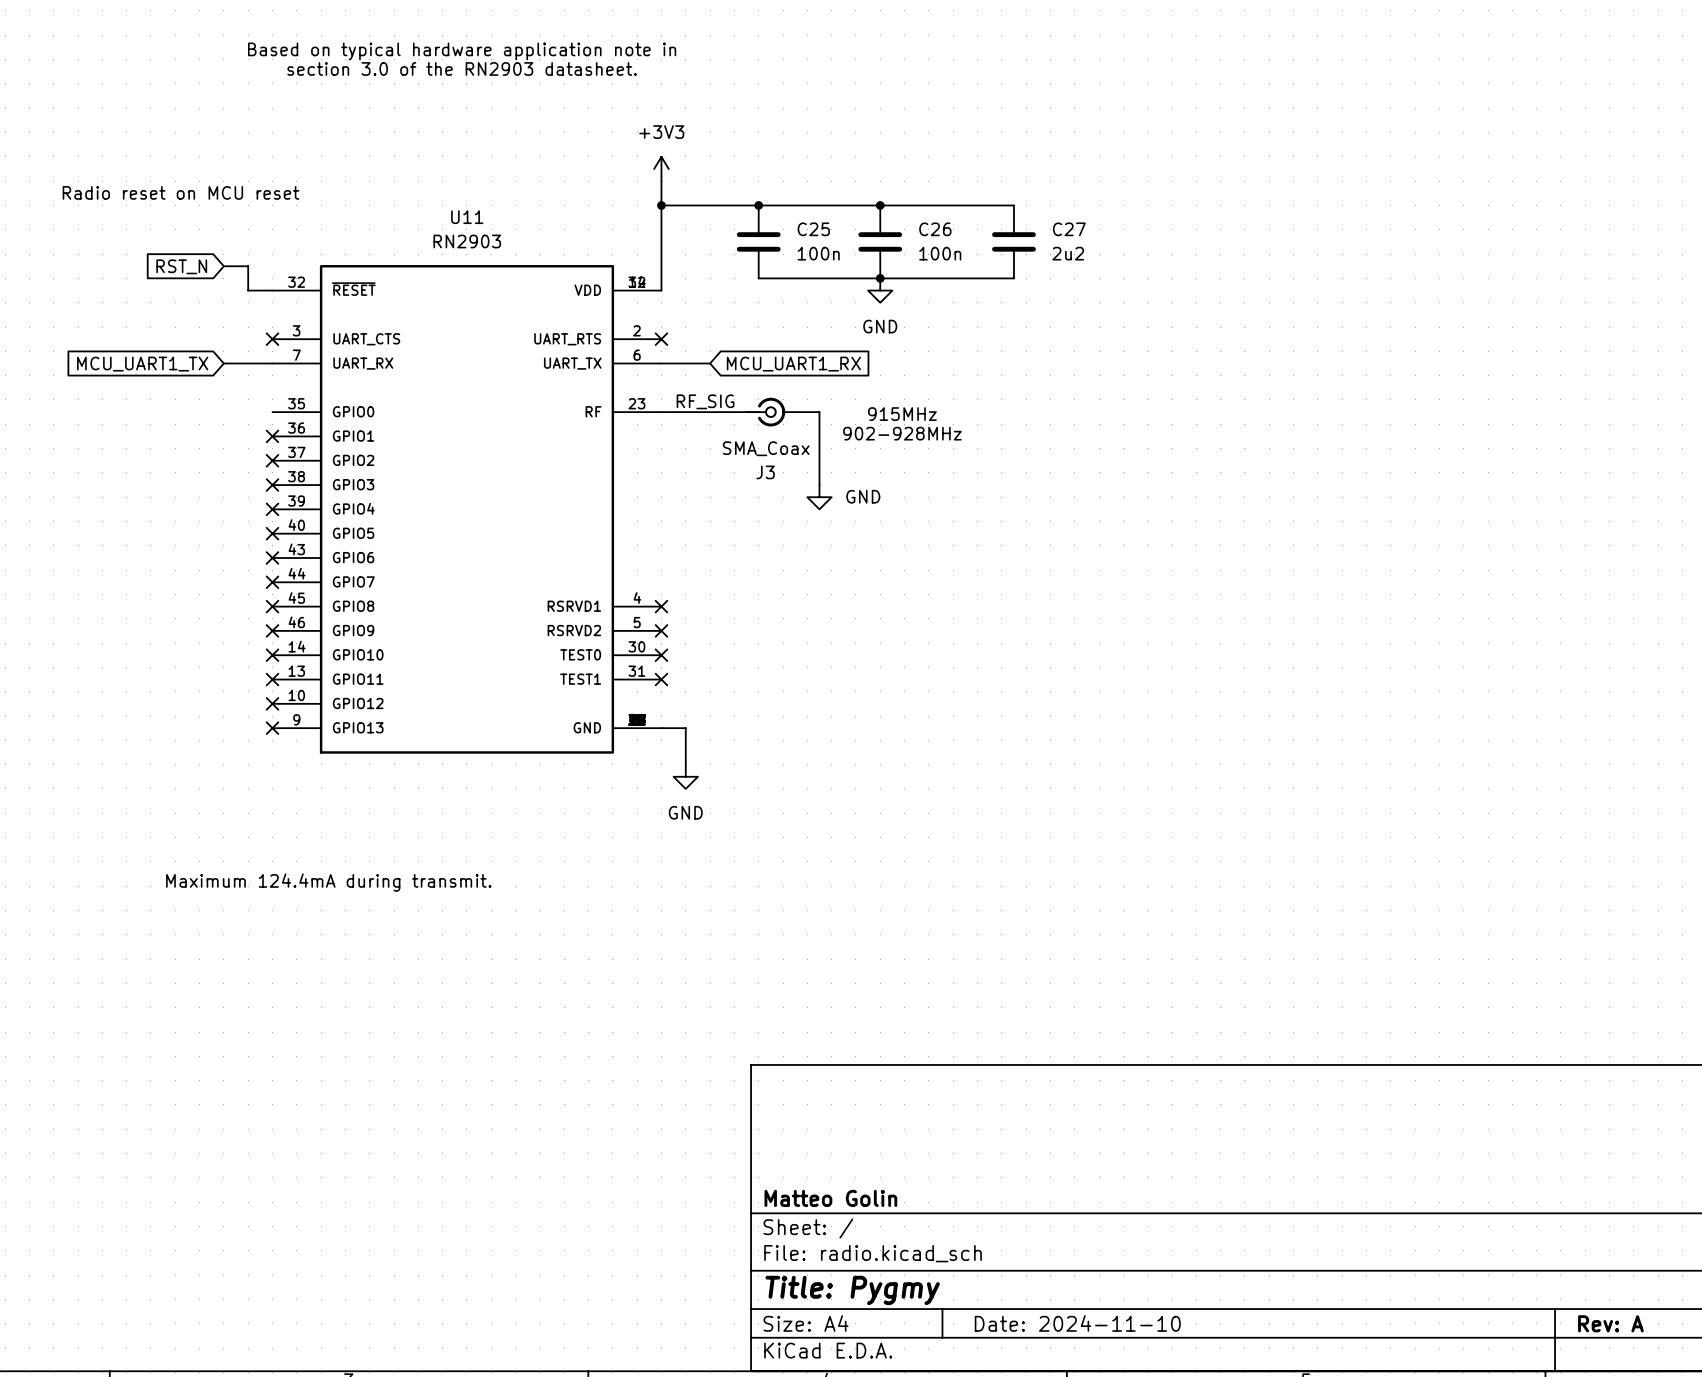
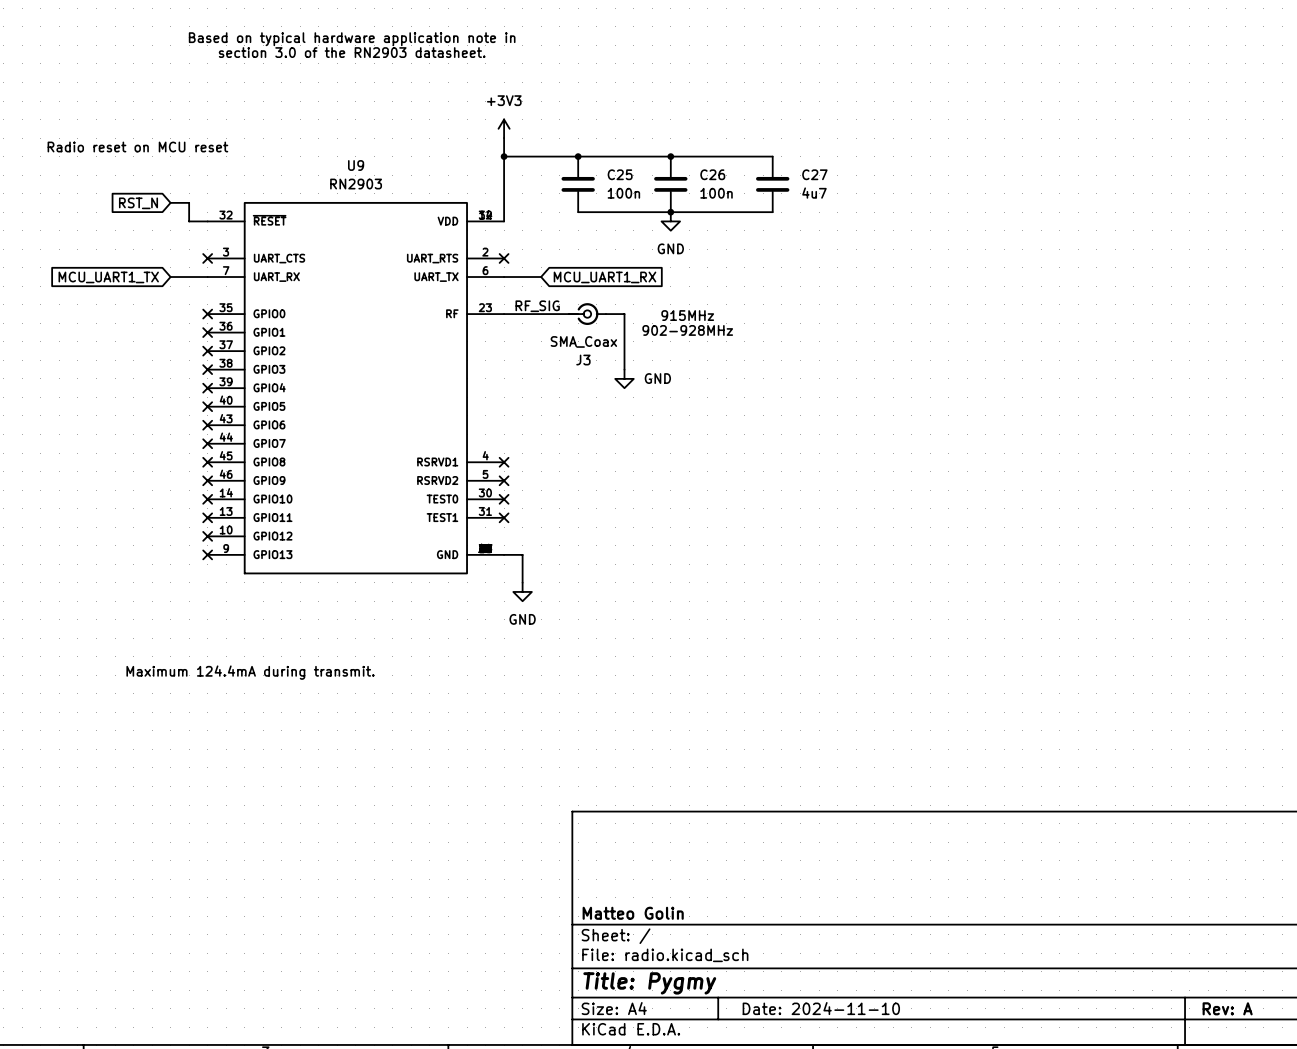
U11 name: U11 (467, 217) -> U9 (356, 165)
C27 value: 2u2 (1068, 253) -> 4u7 (814, 193)
no-connect mark: none -> (207, 314)

